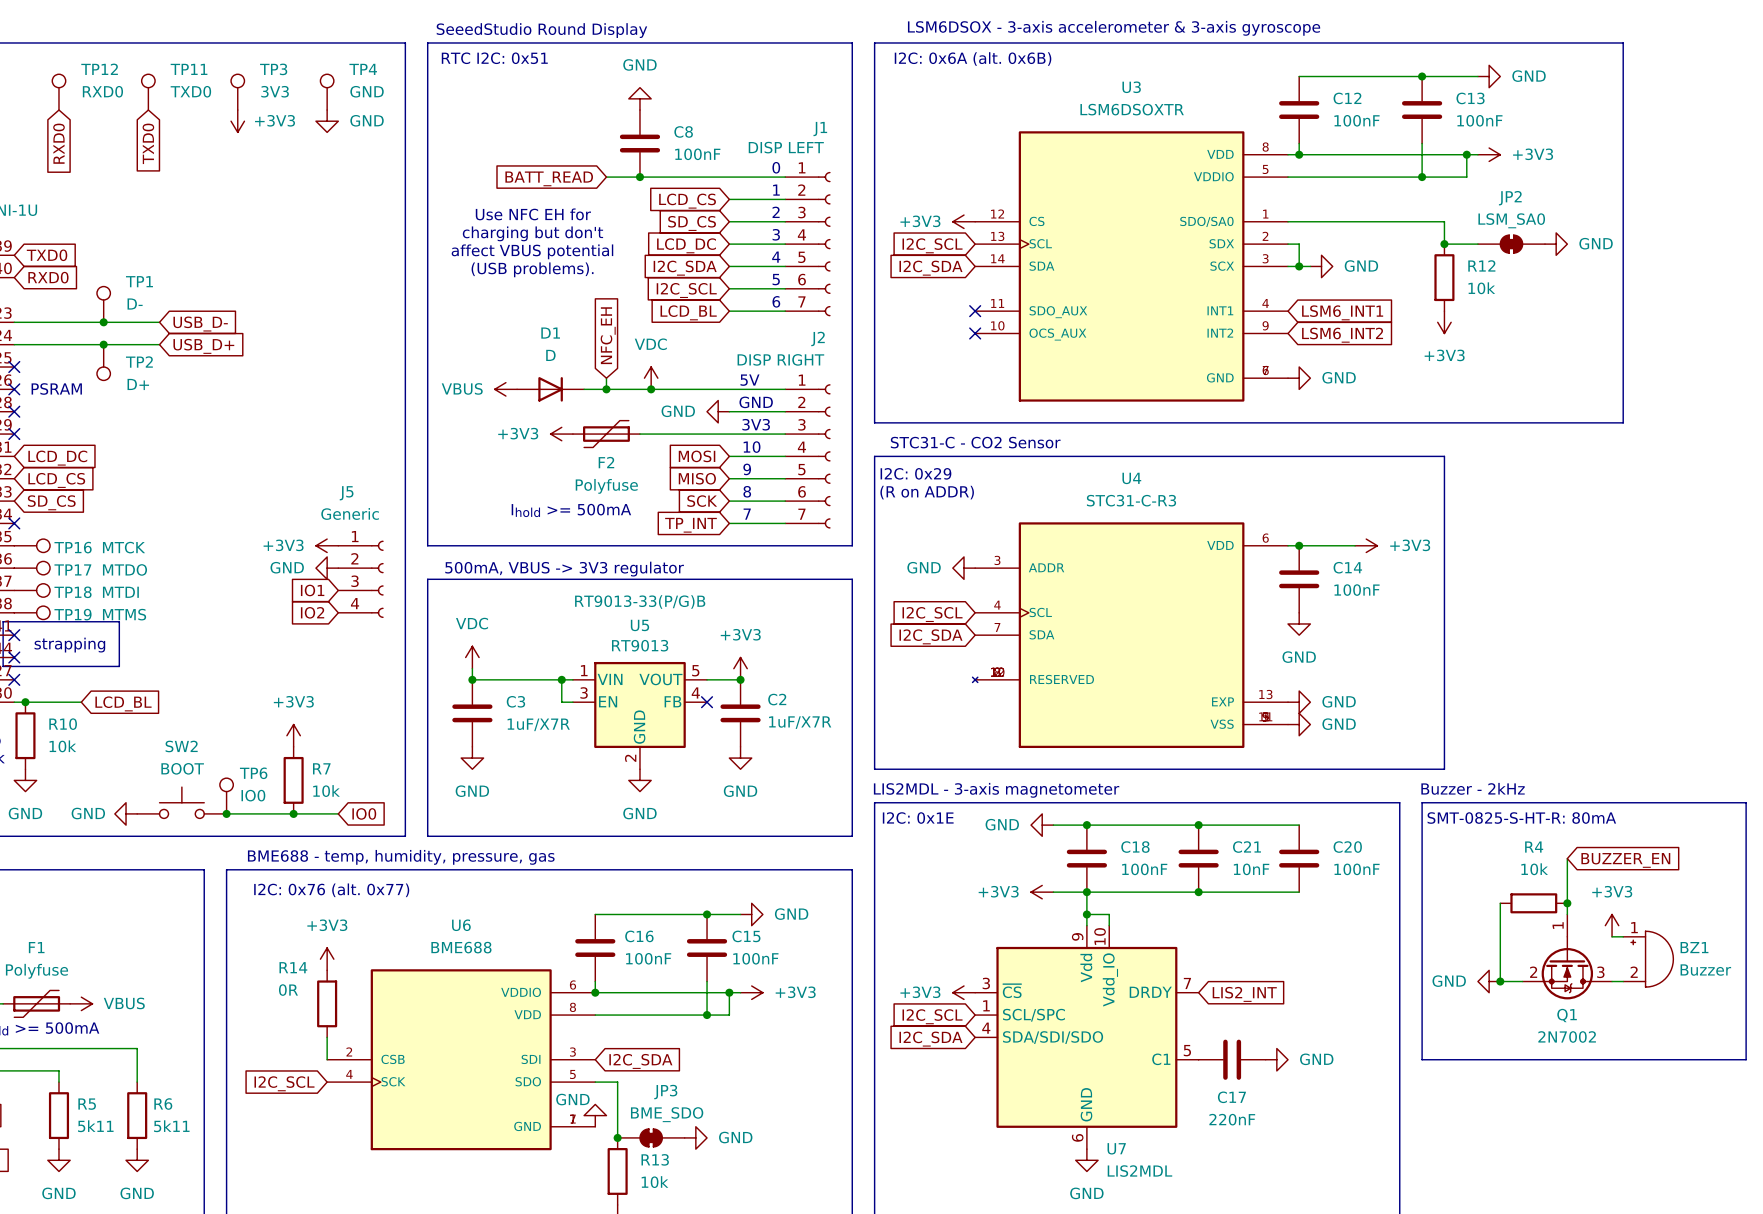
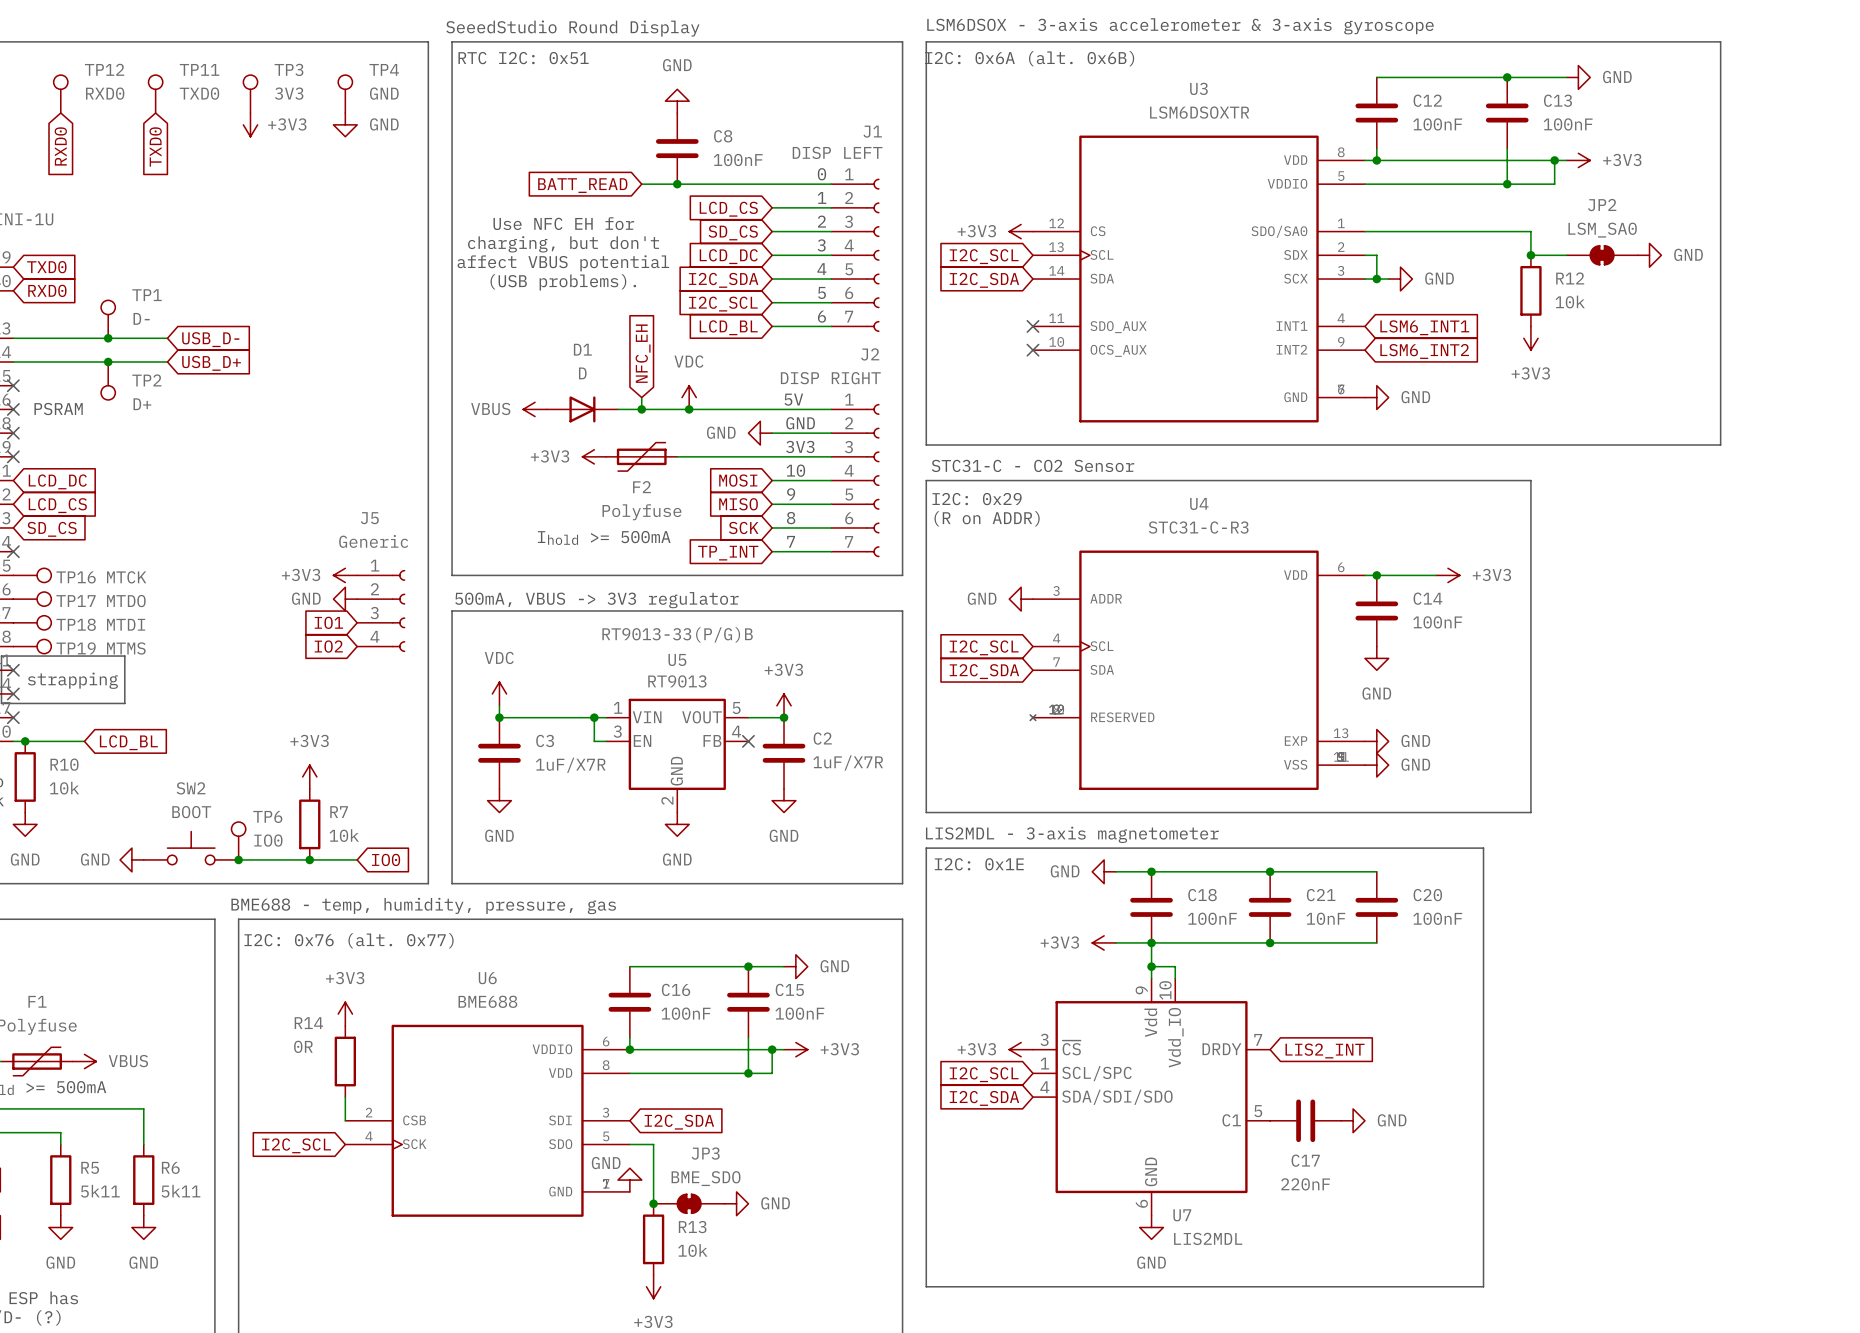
text: charging but don't (532, 233) -> charging, but don't (563, 244)
text: Buzzer - 2kHz (1473, 788) -> none
line: (1422, 802) (1746, 802) (1746, 1059) (1422, 1059) (1422, 802) -> none
text: SMT-0825-S-HT-R: 80mA (1521, 818) -> none
wire: (1567, 858) (1567, 914) -> none
global label: BUZZER_EN (1625, 860) -> none
wire: (1500, 903) (1500, 981) (1522, 981) -> none
R4: 10k (1533, 903) -> none
junction: (1567, 903) -> none
power symbol: +3V3 (1612, 925) -> none
wire: (1612, 936) (1623, 936) -> none
Q1: 2N7002 (1567, 956) -> none
BZ1: Buzzer (1648, 959) -> none
power symbol: GND (1489, 981) -> none
junction: (1500, 981) -> none
wire: (1612, 981) (1623, 981) -> none

